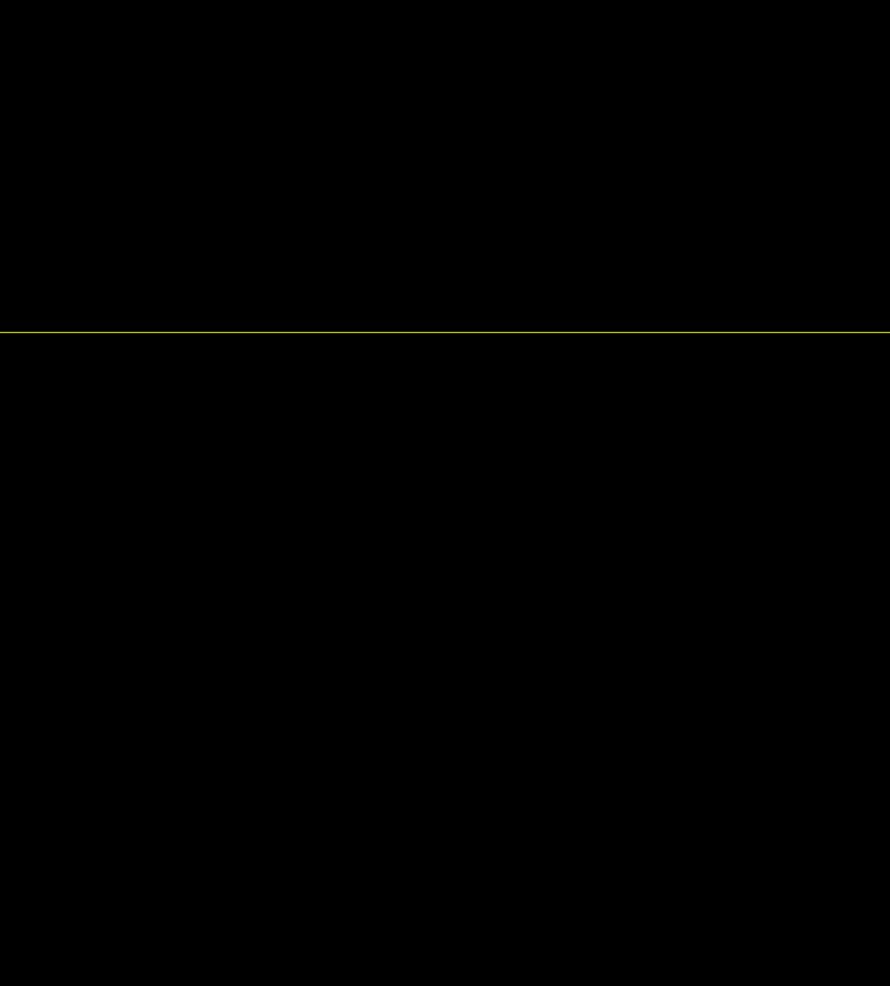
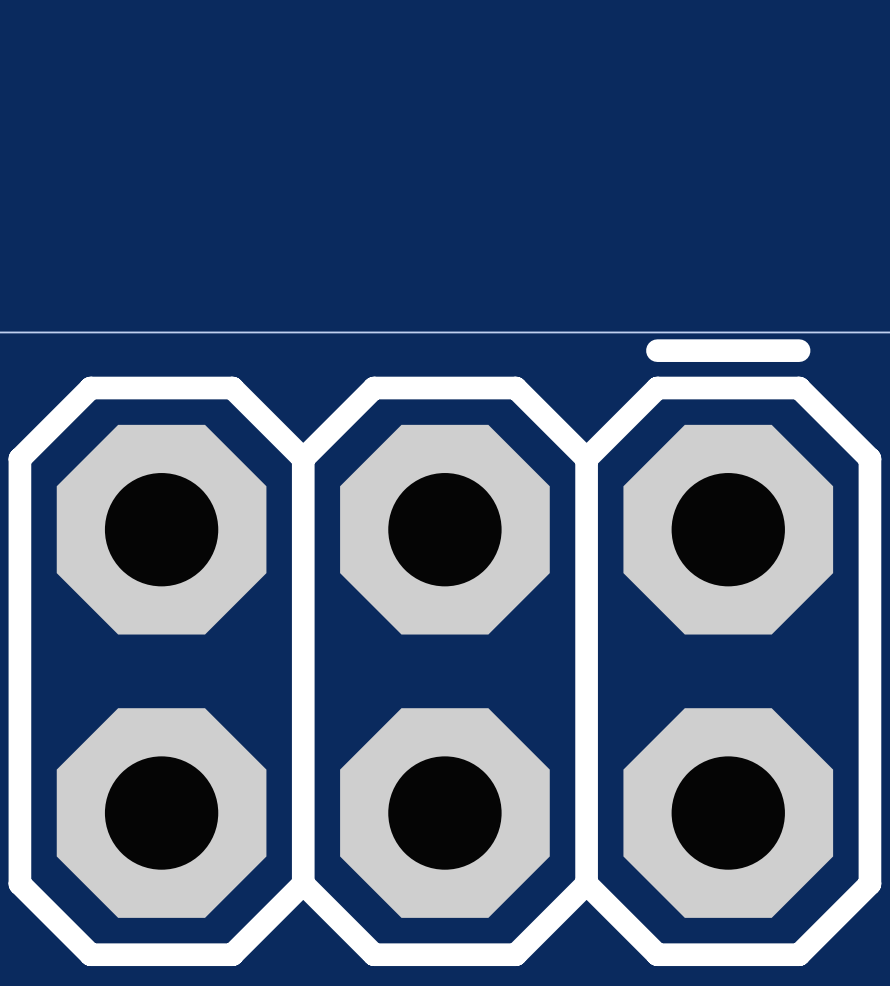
part: none -> (444, 652)

